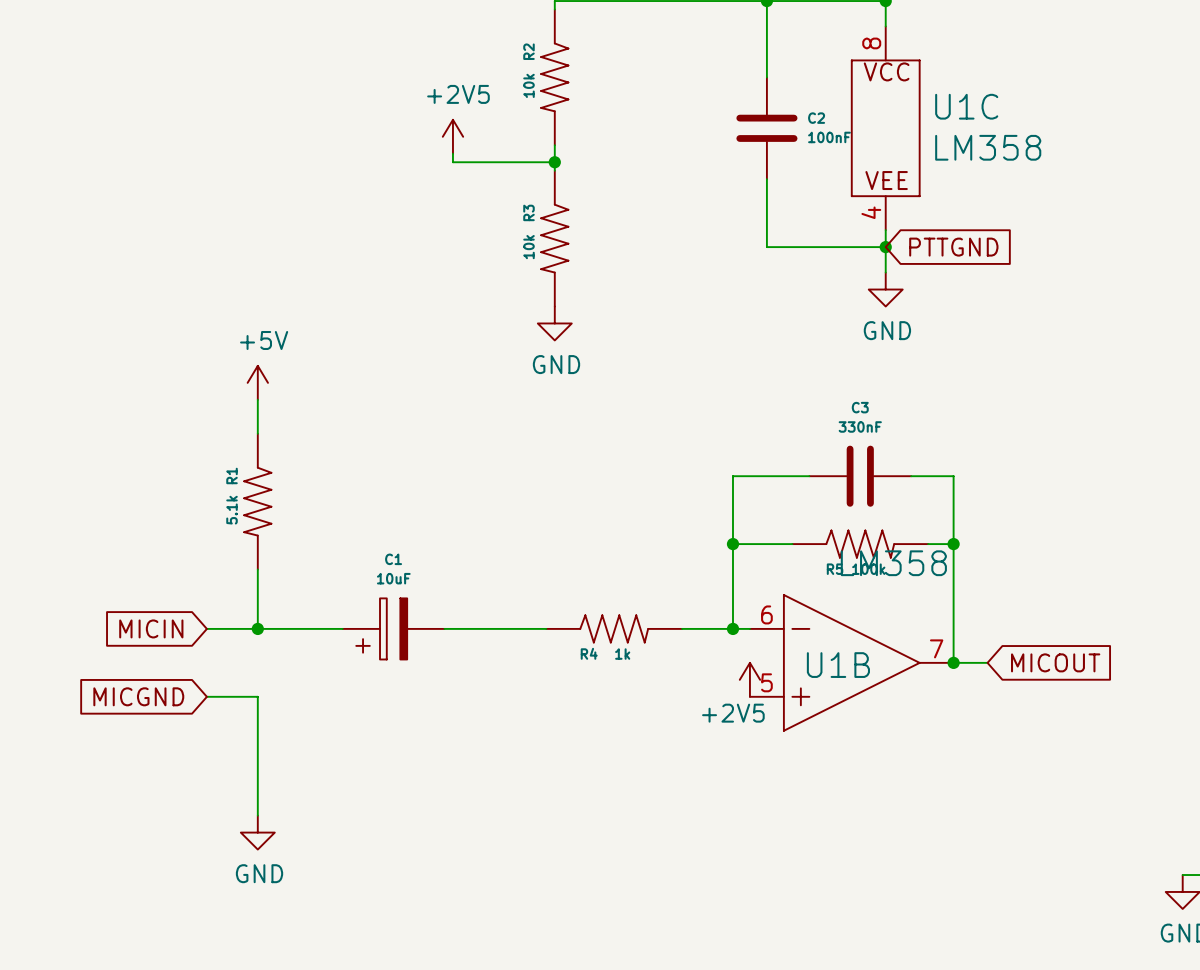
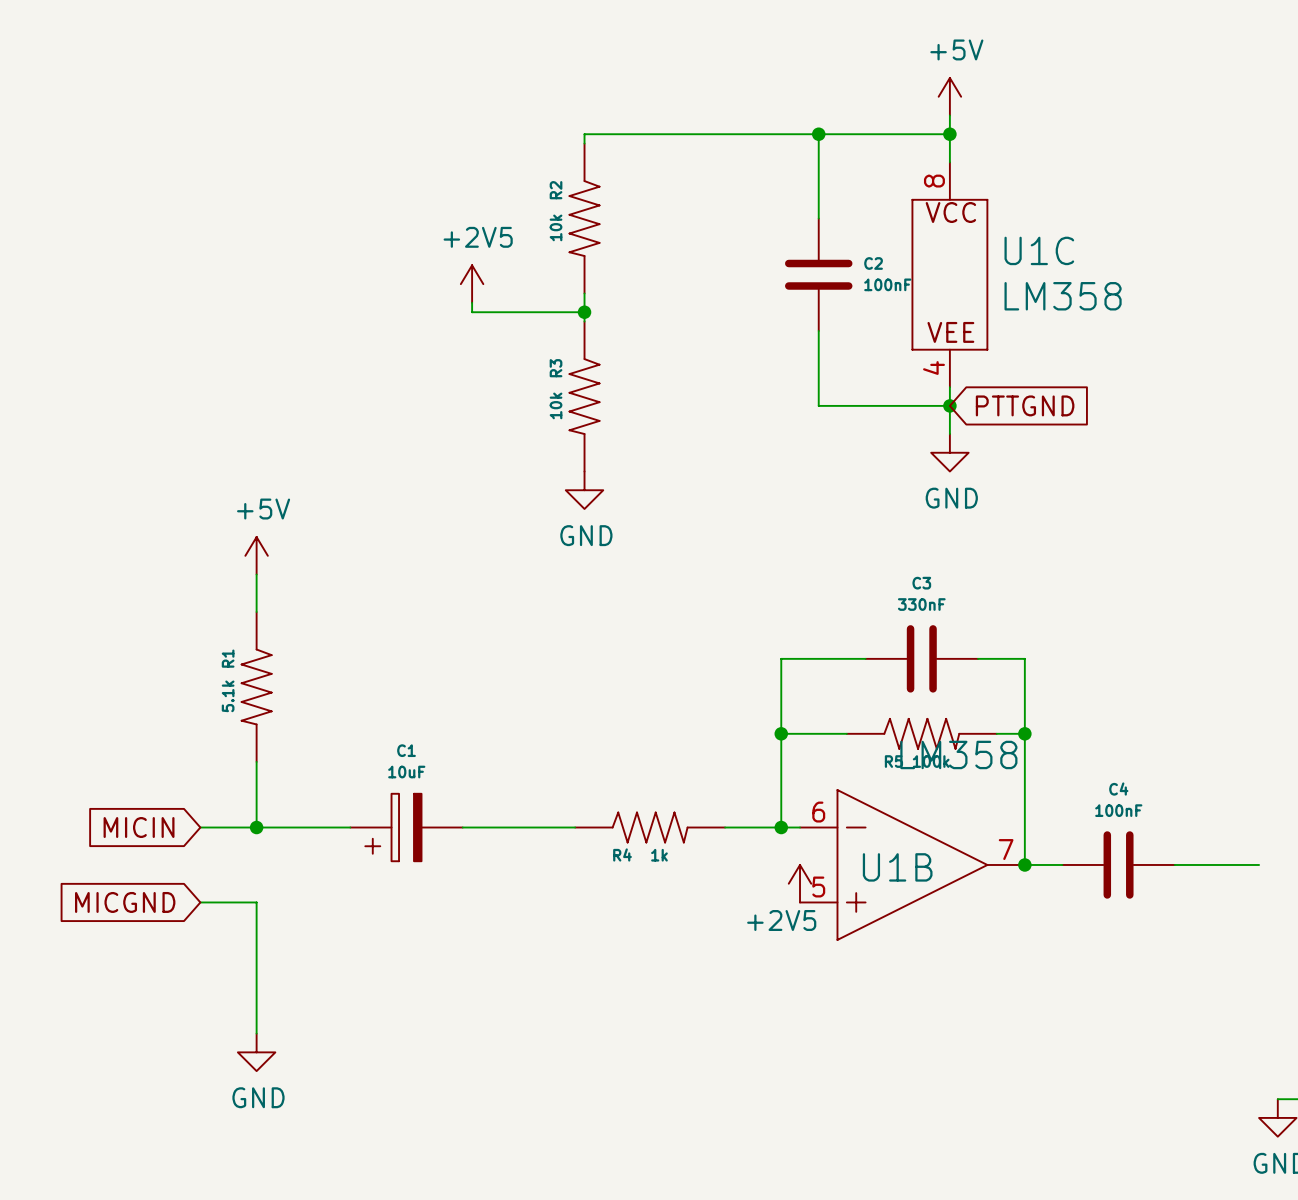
C4: none -> 100nF (1118, 864)
global label: MICOUT (1055, 662) -> none
wire: none -> (1174, 864) (1259, 864)

